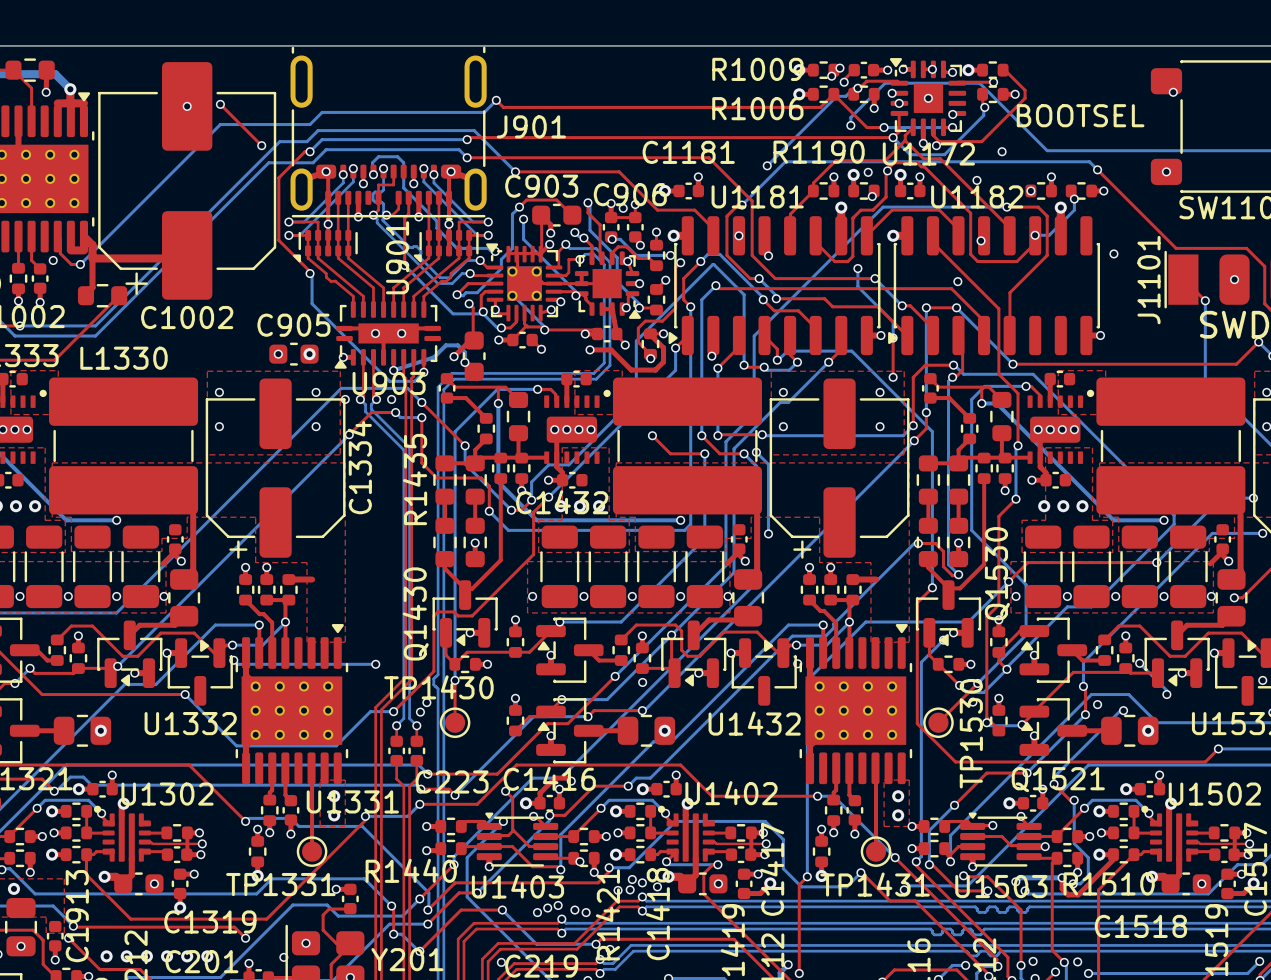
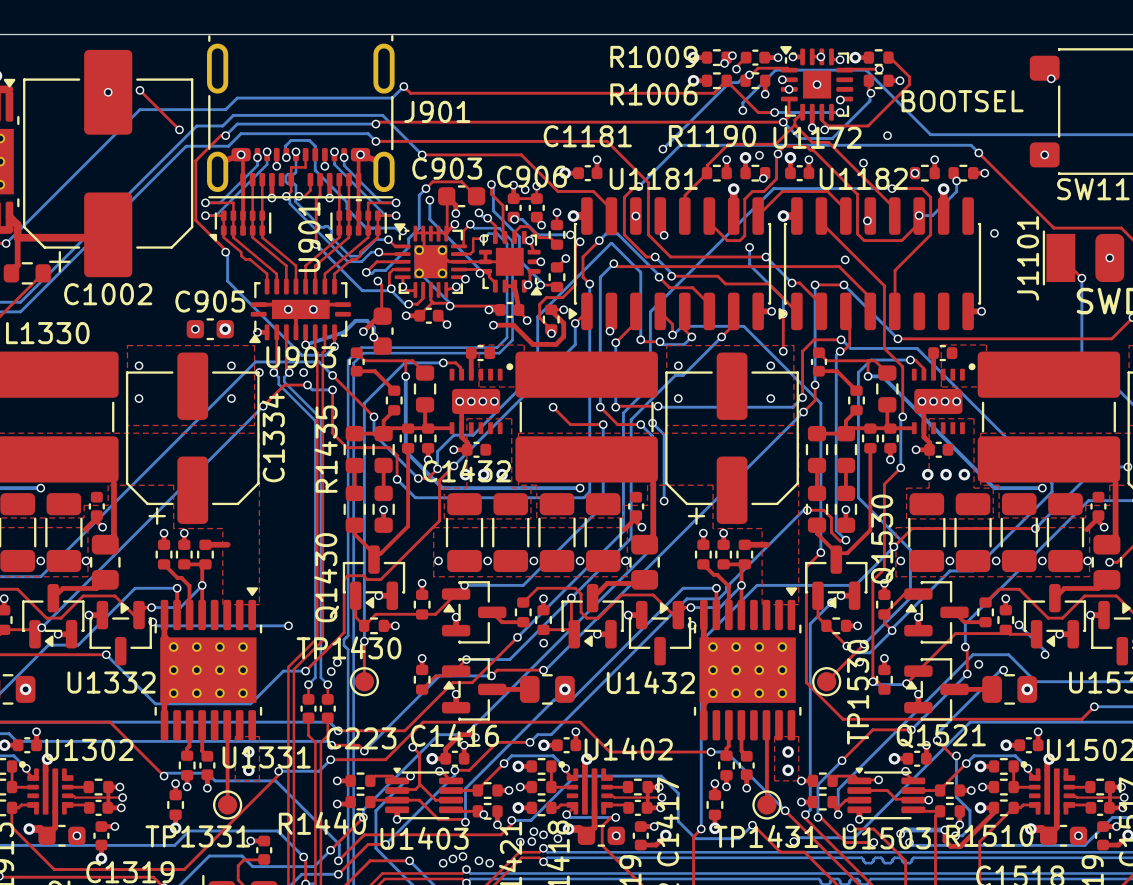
via: (328, 224) -> none
via: (449, 224) -> none

